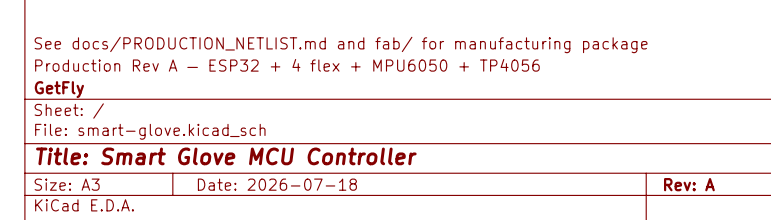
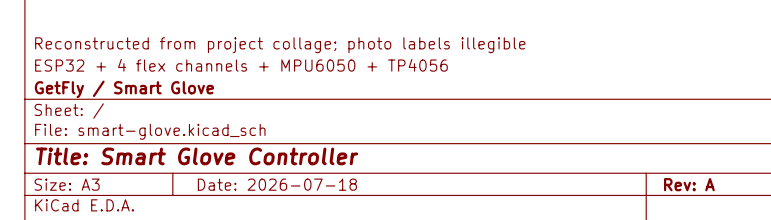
title block: See docs/PRODUCTION_NETLIST.md and fab/ for manufacturing package (341, 44) -> Reconstructed from project collage; photo labels illegible (280, 45)
title block: Production Rev A — ESP32 + 4 flex + MPU6050 + TP4056 (287, 65) -> ESP32 + 4 flex channels + MPU6050 + TP4056 (241, 65)
title block: GetFly (59, 89) -> GetFly / Smart Glove (124, 89)
title block: Title: Smart Glove MCU Controller (226, 156) -> Title: Smart Glove Controller (197, 156)

